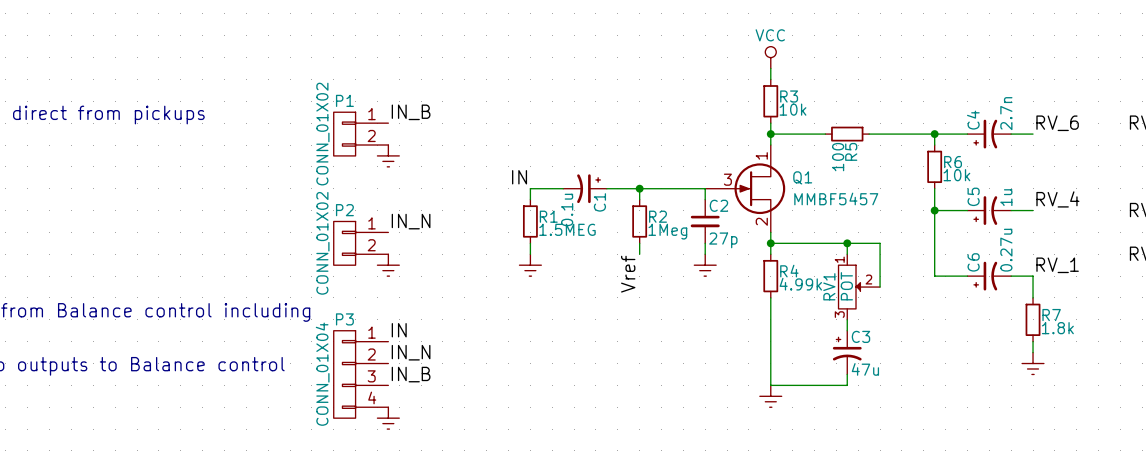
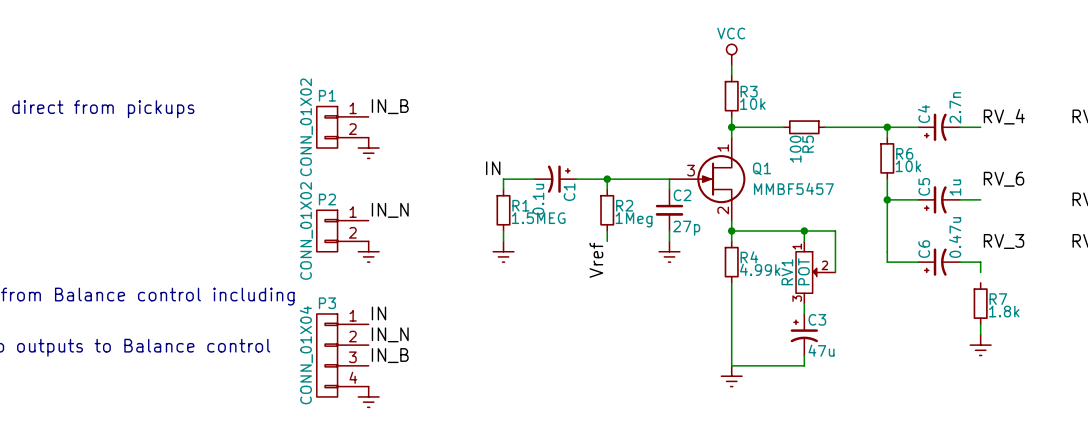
label: RV_6 (1057, 123) -> RV_4 (1004, 116)
label: RV_4 (1057, 199) -> RV_6 (1004, 179)
C6 value: 0.27u (1006, 250) -> 0.47u (955, 237)
label: RV_1 (1057, 265) -> RV_3 (1004, 241)
wire: (1033, 287) (1033, 297) -> none

